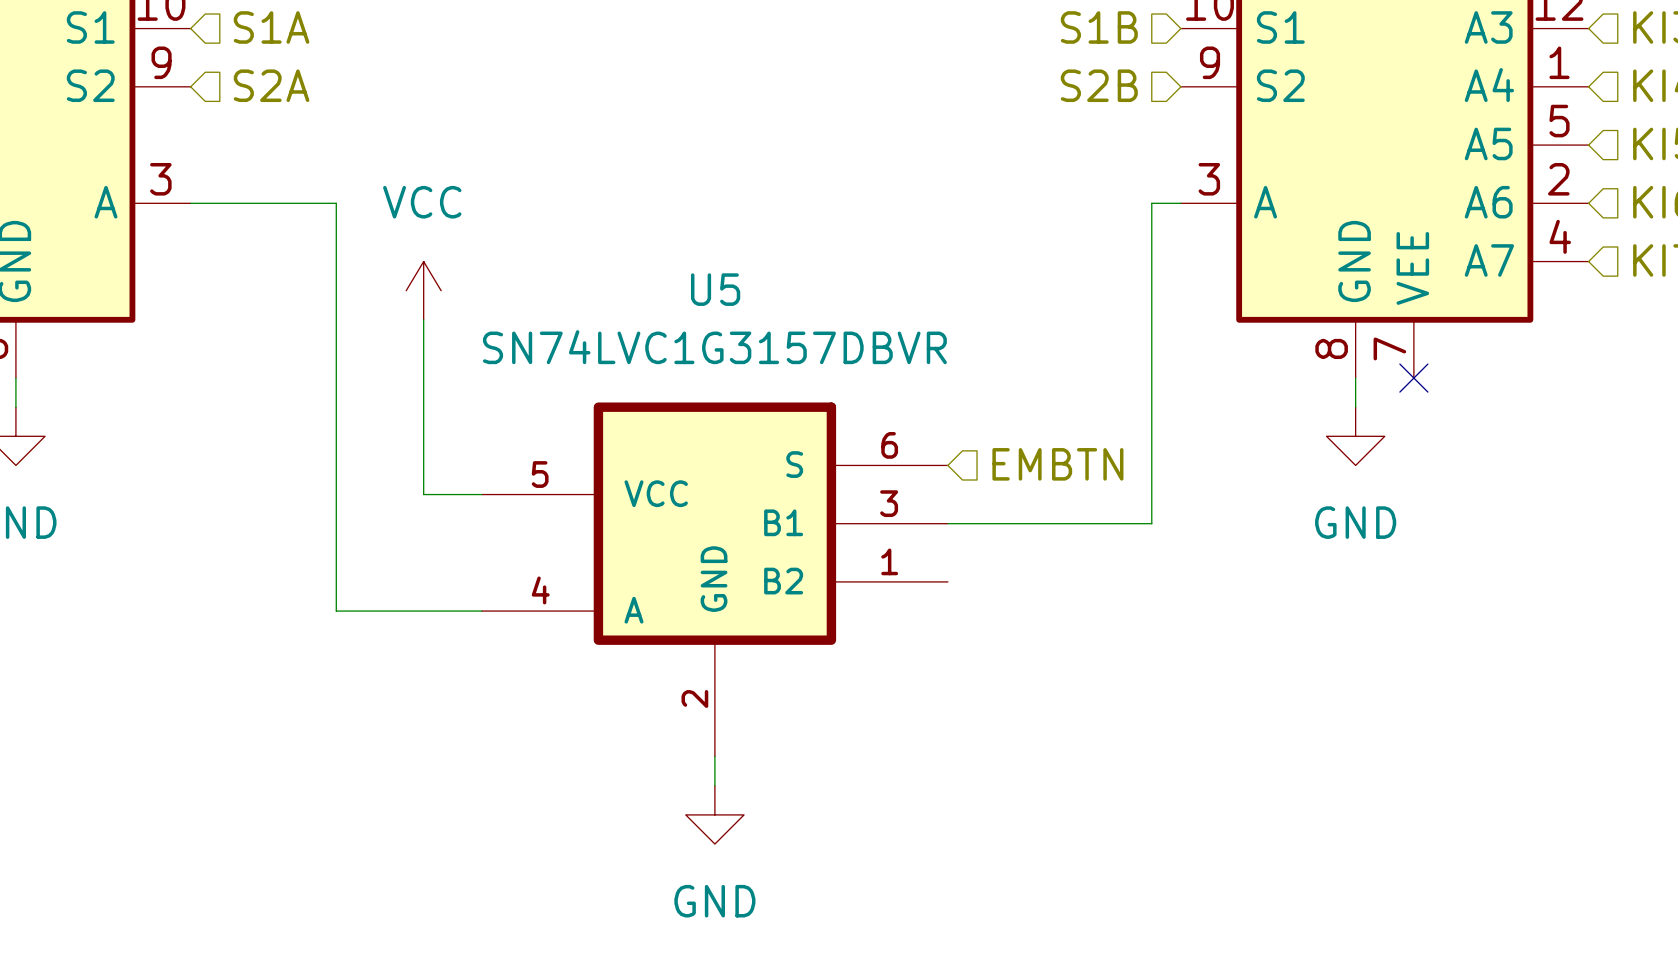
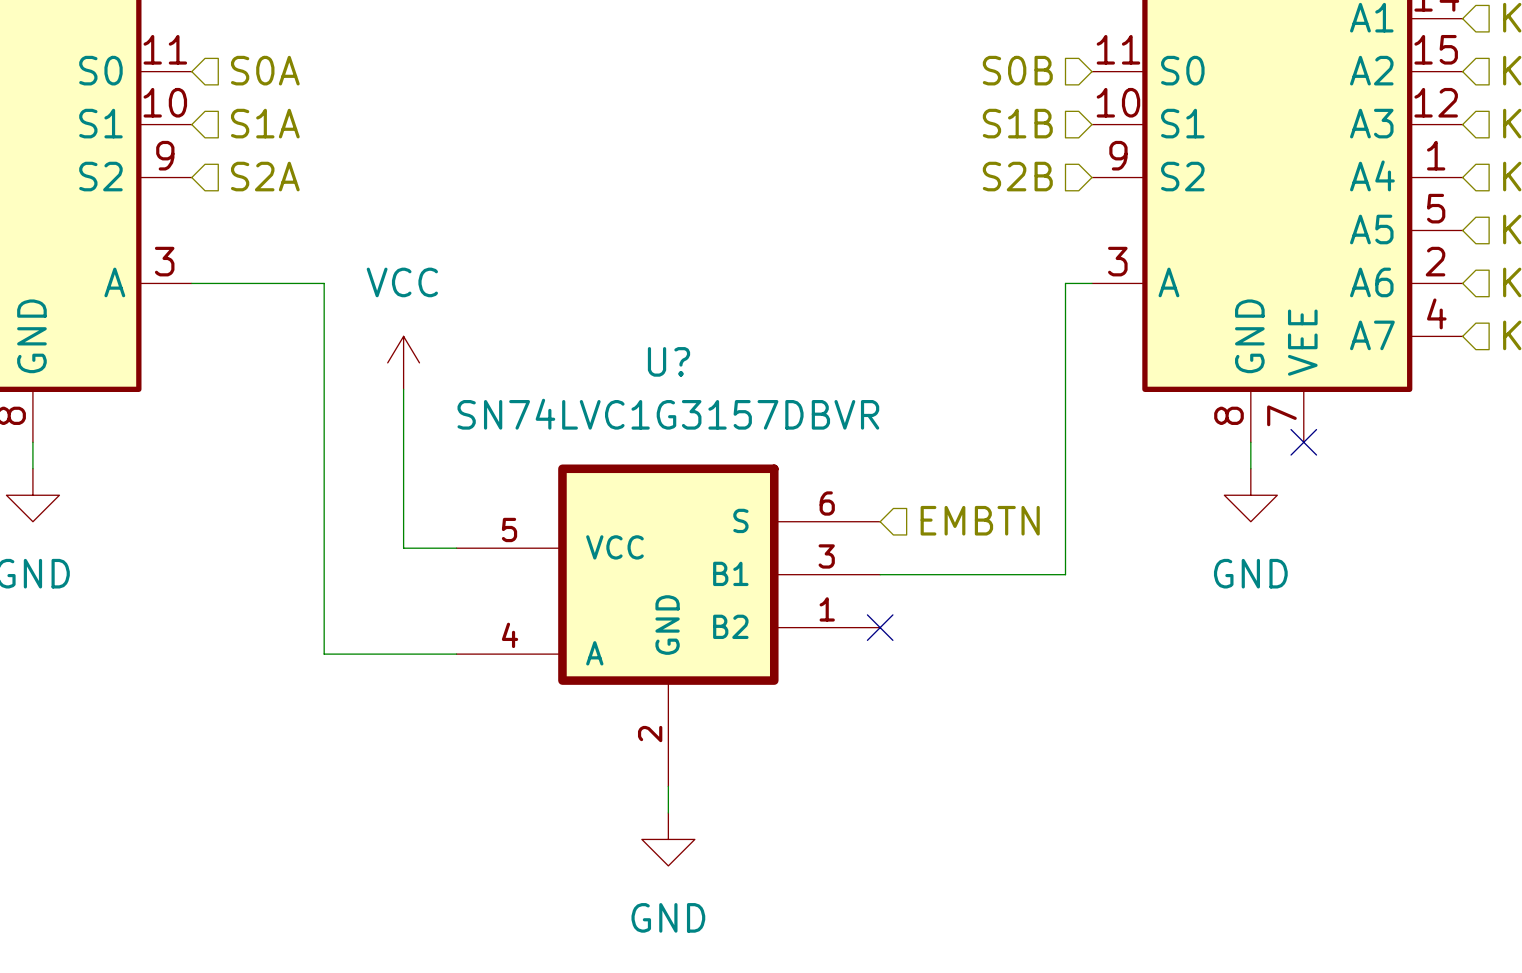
U5 name: U5 (715, 289) -> U? (668, 361)
no-connect mark: none -> (880, 627)

